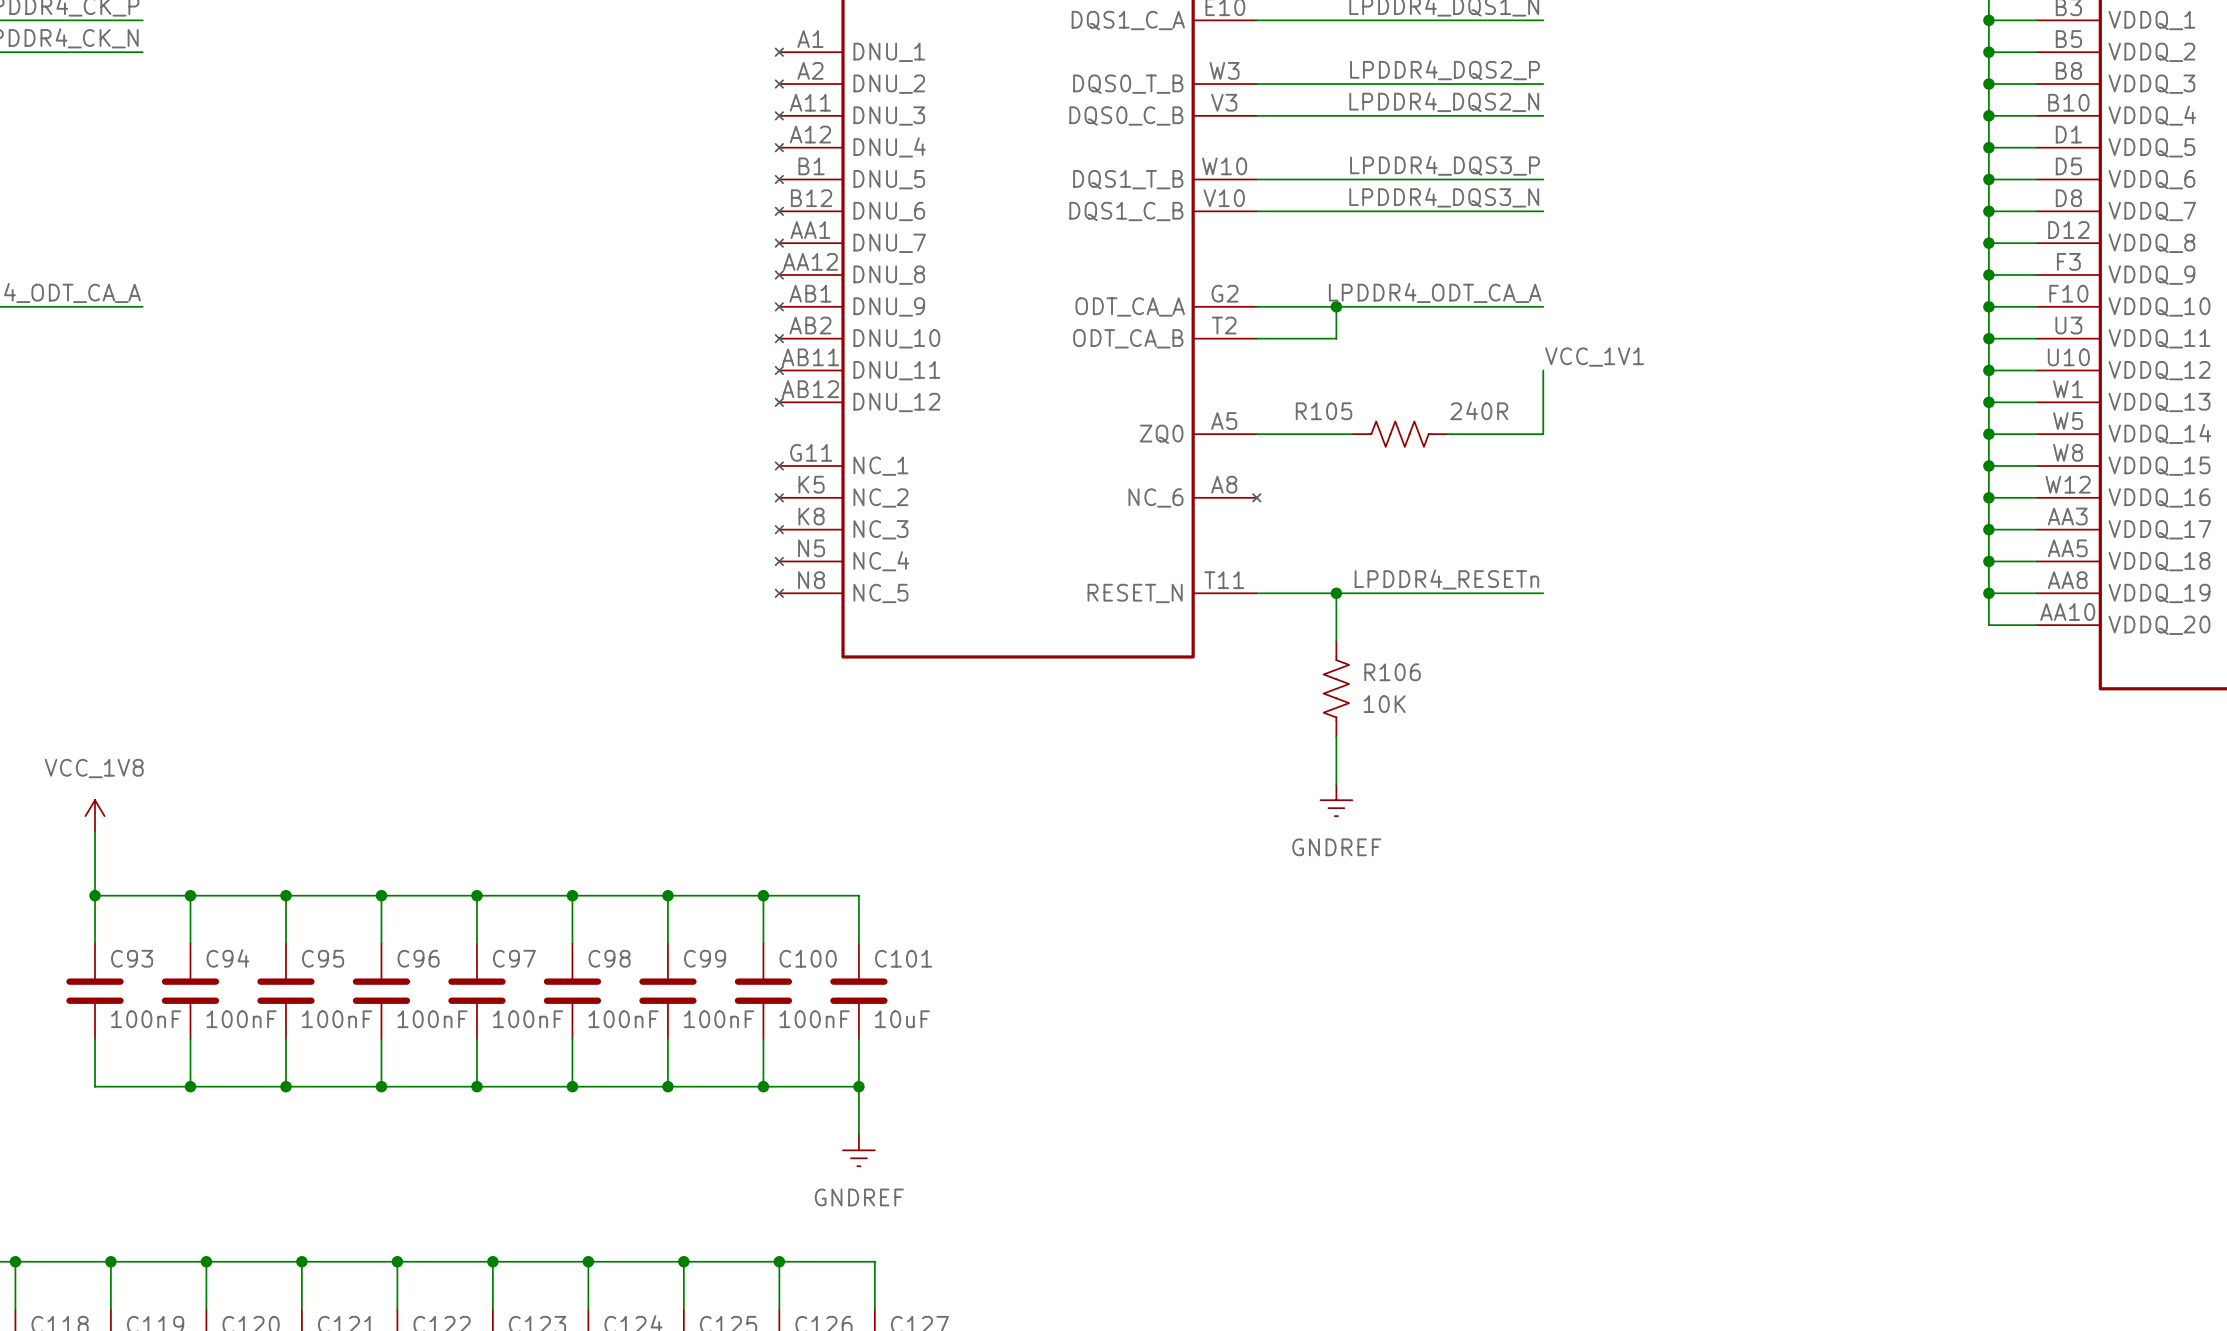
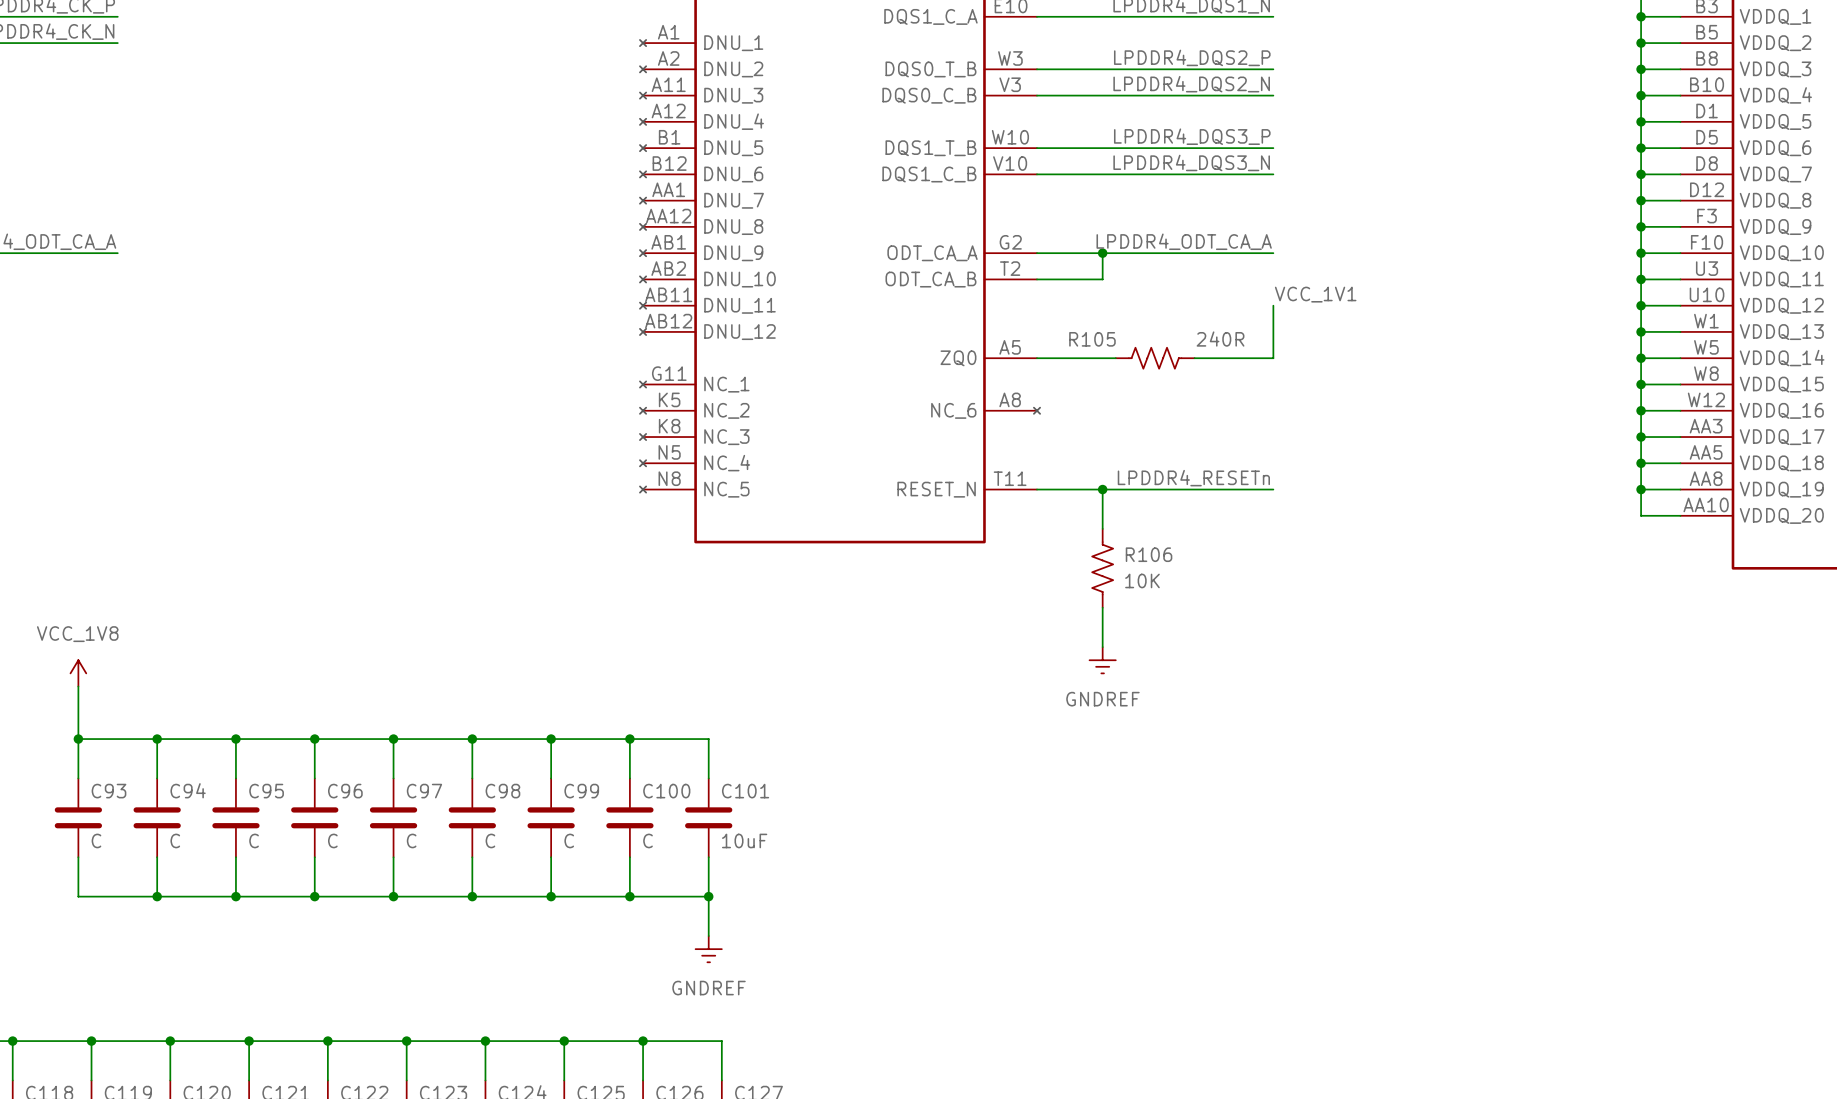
C93 value: 100nF (146, 1019) -> C (96, 840)
C94 value: 100nF (241, 1019) -> C (175, 840)
C95 value: 100nF (337, 1019) -> C (254, 840)
C96 value: 100nF (432, 1019) -> C (332, 840)
C97 value: 100nF (528, 1019) -> C (411, 840)
C98 value: 100nF (623, 1019) -> C (490, 840)
C99 value: 100nF (719, 1019) -> C (569, 840)
C100 value: 100nF (814, 1019) -> C (648, 840)

